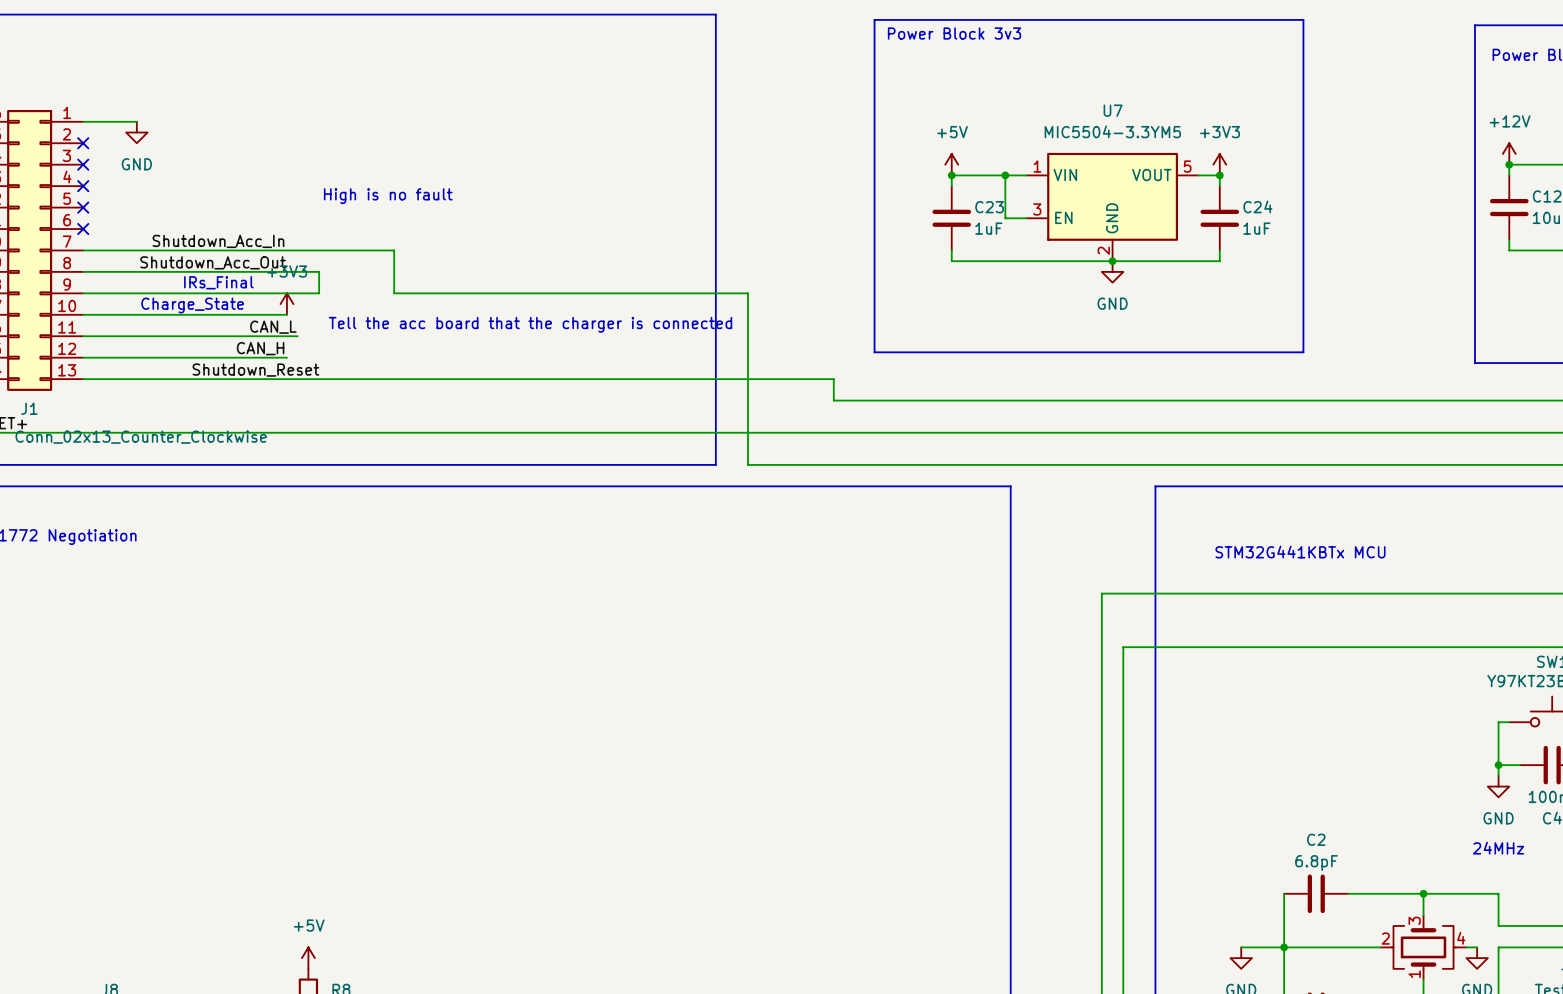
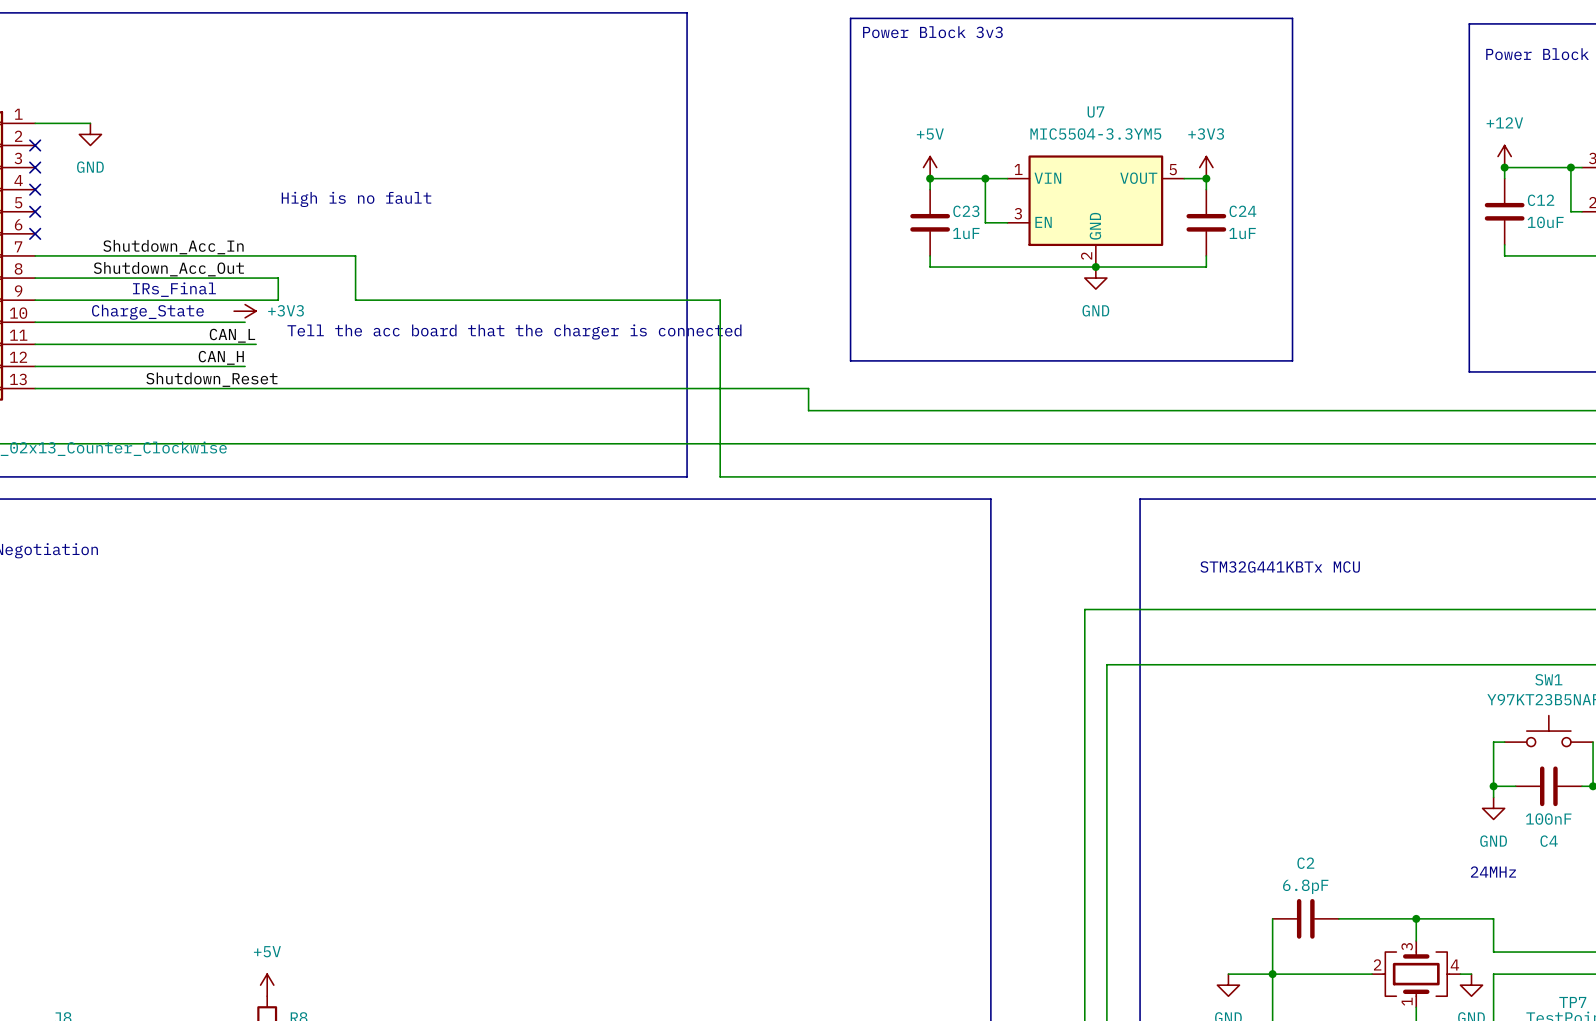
power symbol rotation: 0° (286, 304) -> 90° clockwise (245, 311)

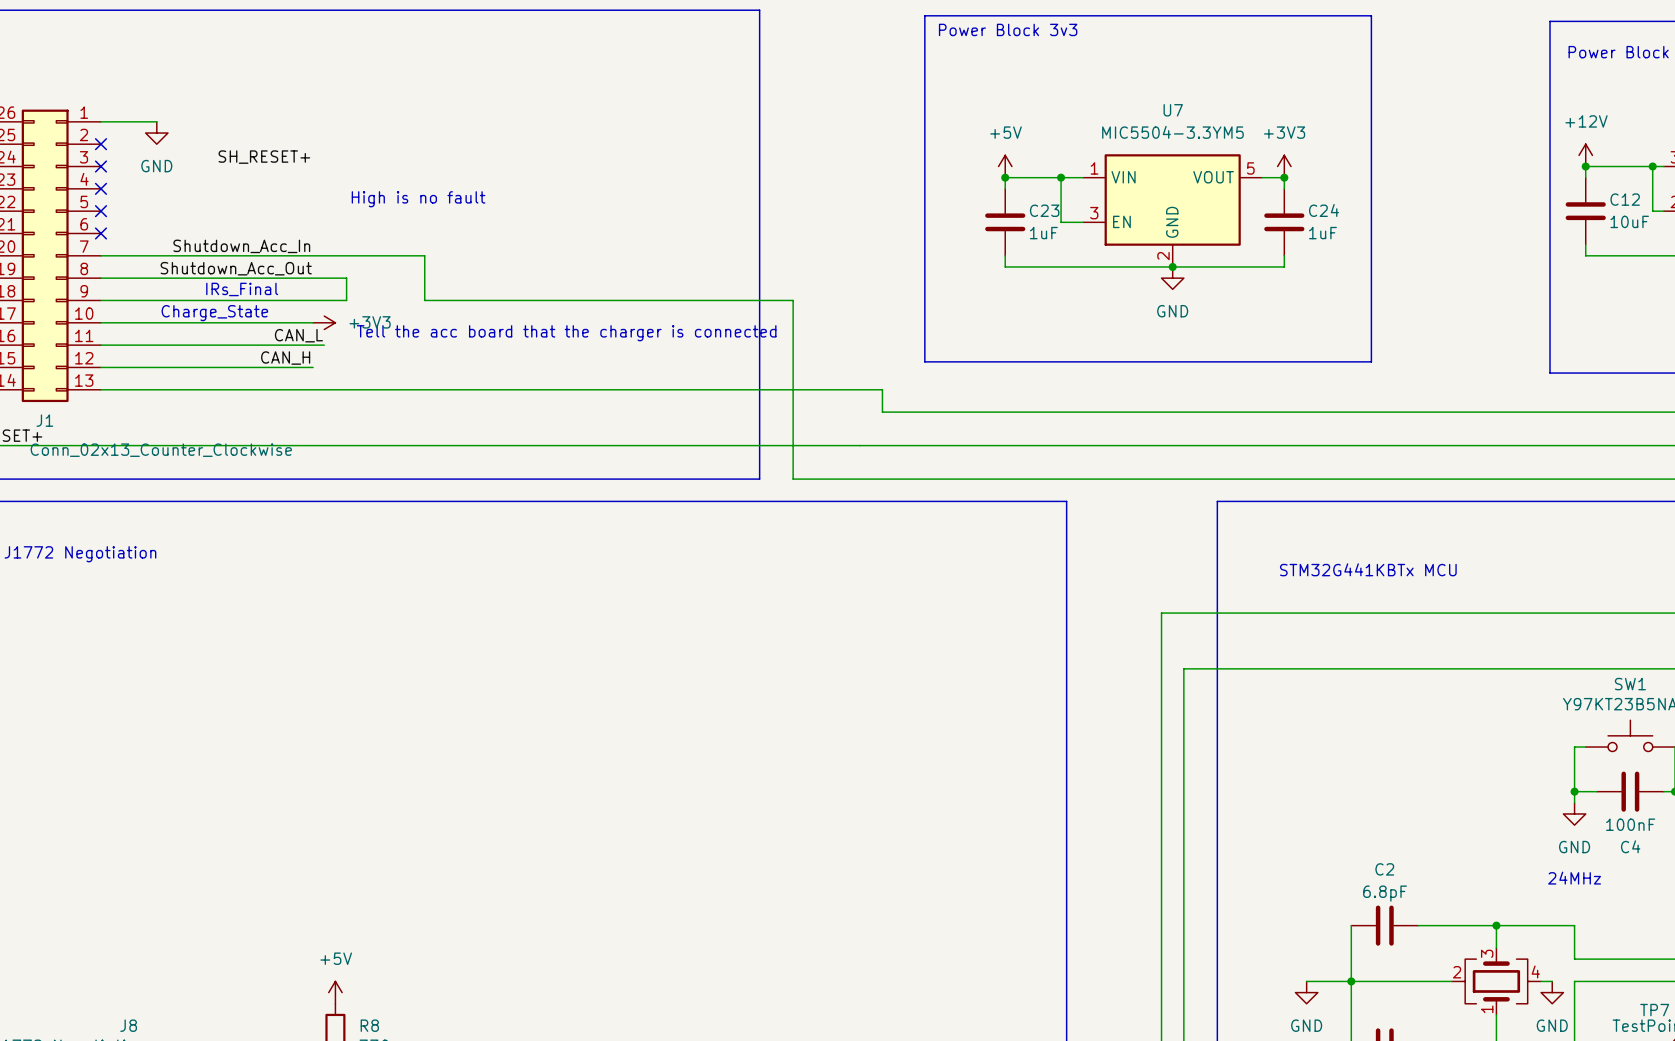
label: none -> SH_RESET+ (264, 157)
power symbol position: +3V3 (245, 311) -> +3V3 (324, 322)
label: Shutdown_Reset (211, 379) -> none

